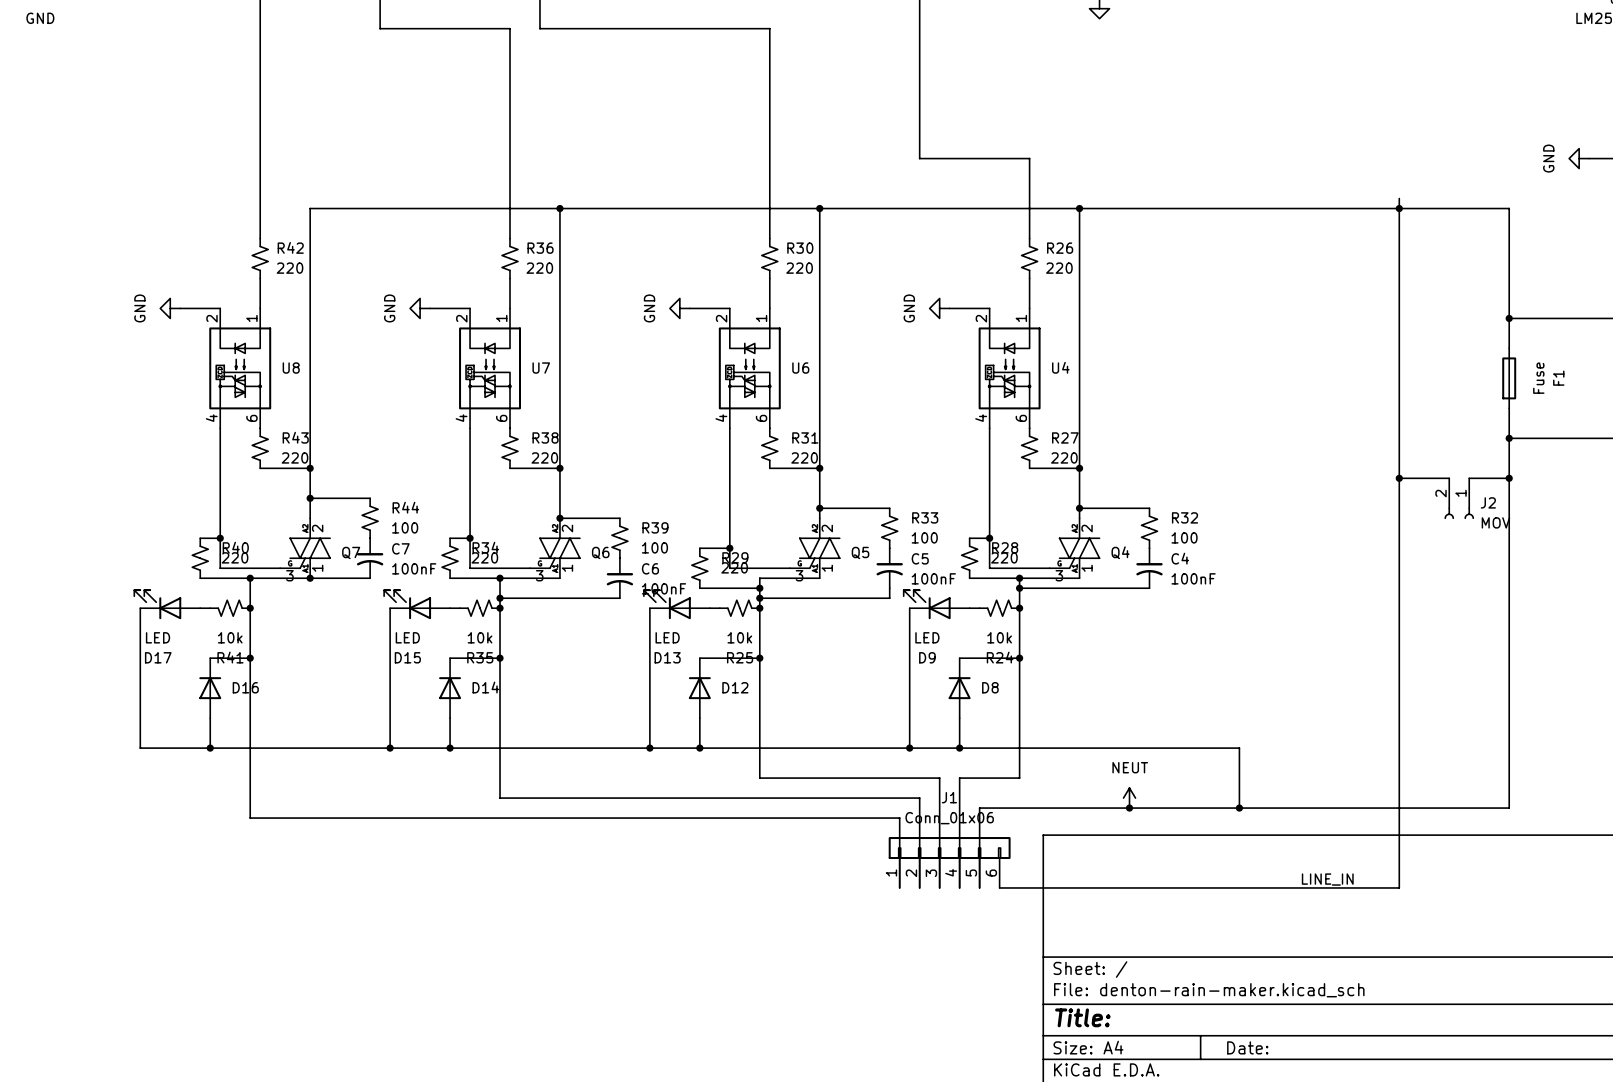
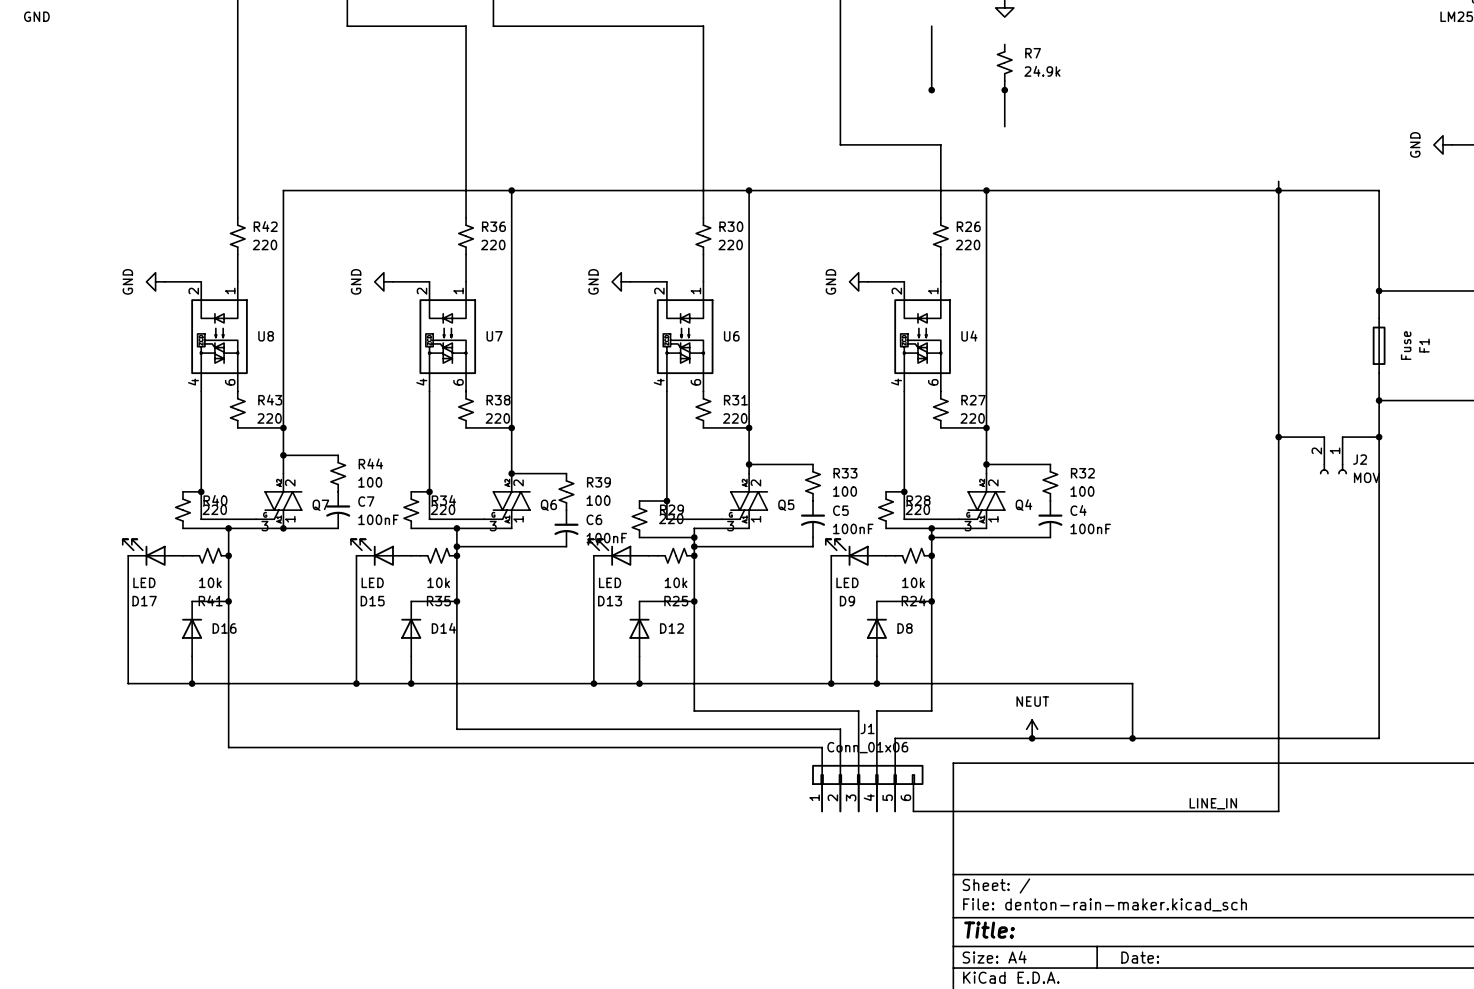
wire: none -> (931, 26) (931, 90)
R7: none -> 24.9k (1004, 62)
wire: none -> (1004, 80) (1004, 126)
junction: none -> (931, 90)
junction: none -> (1004, 90)

